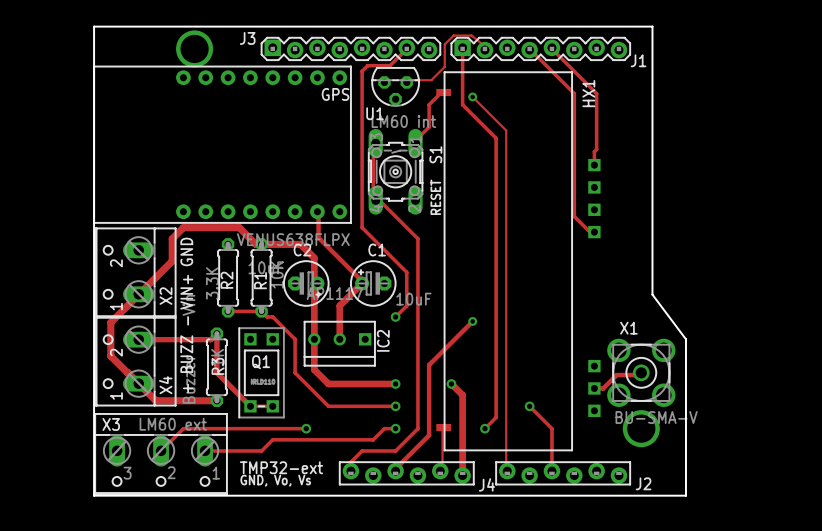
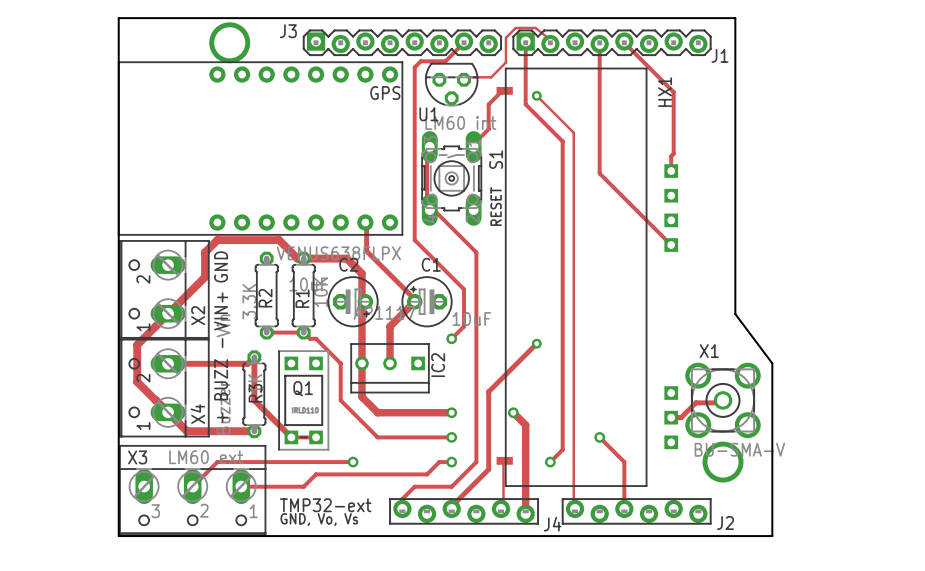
track: (529, 48) (574, 93) (574, 216) (589, 232) (594, 232) -> (599, 44) (599, 173) (671, 245)

